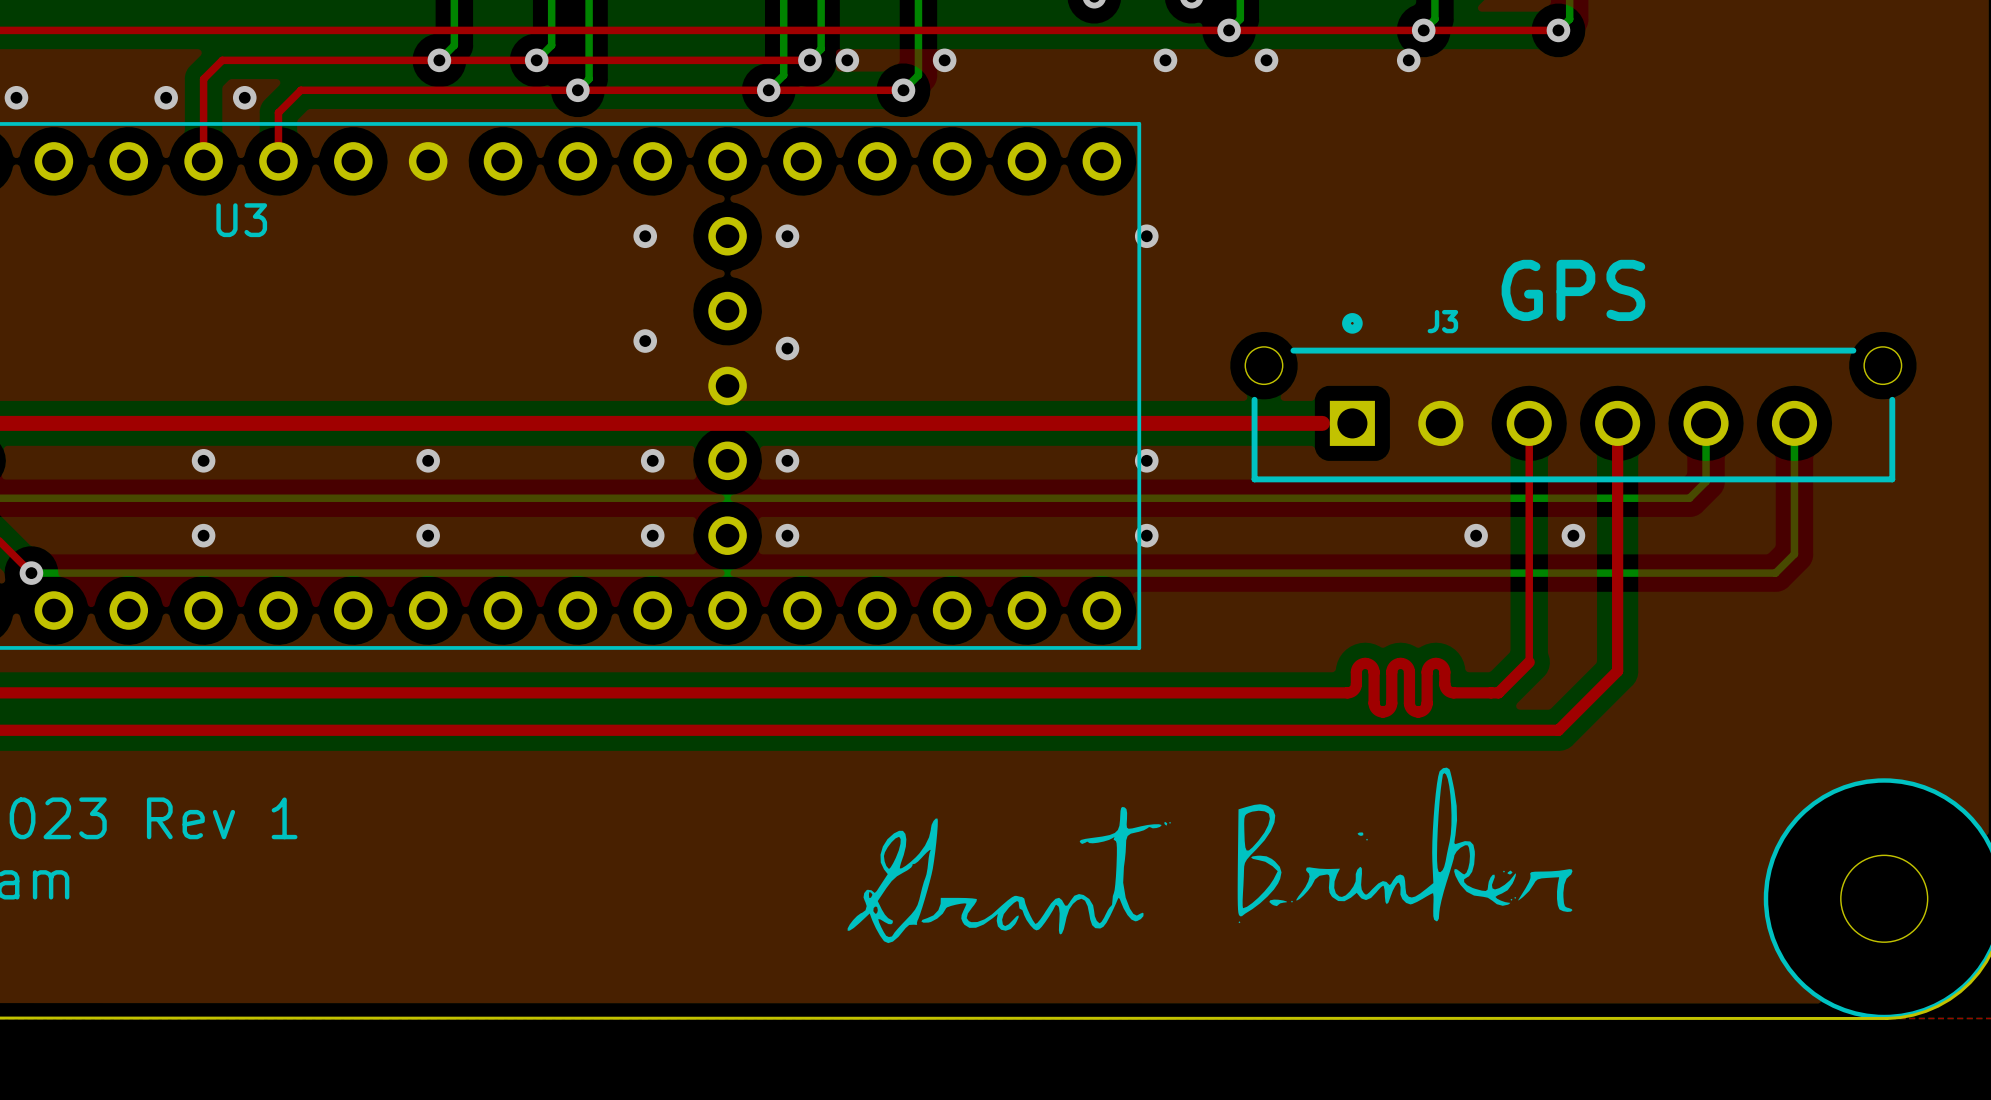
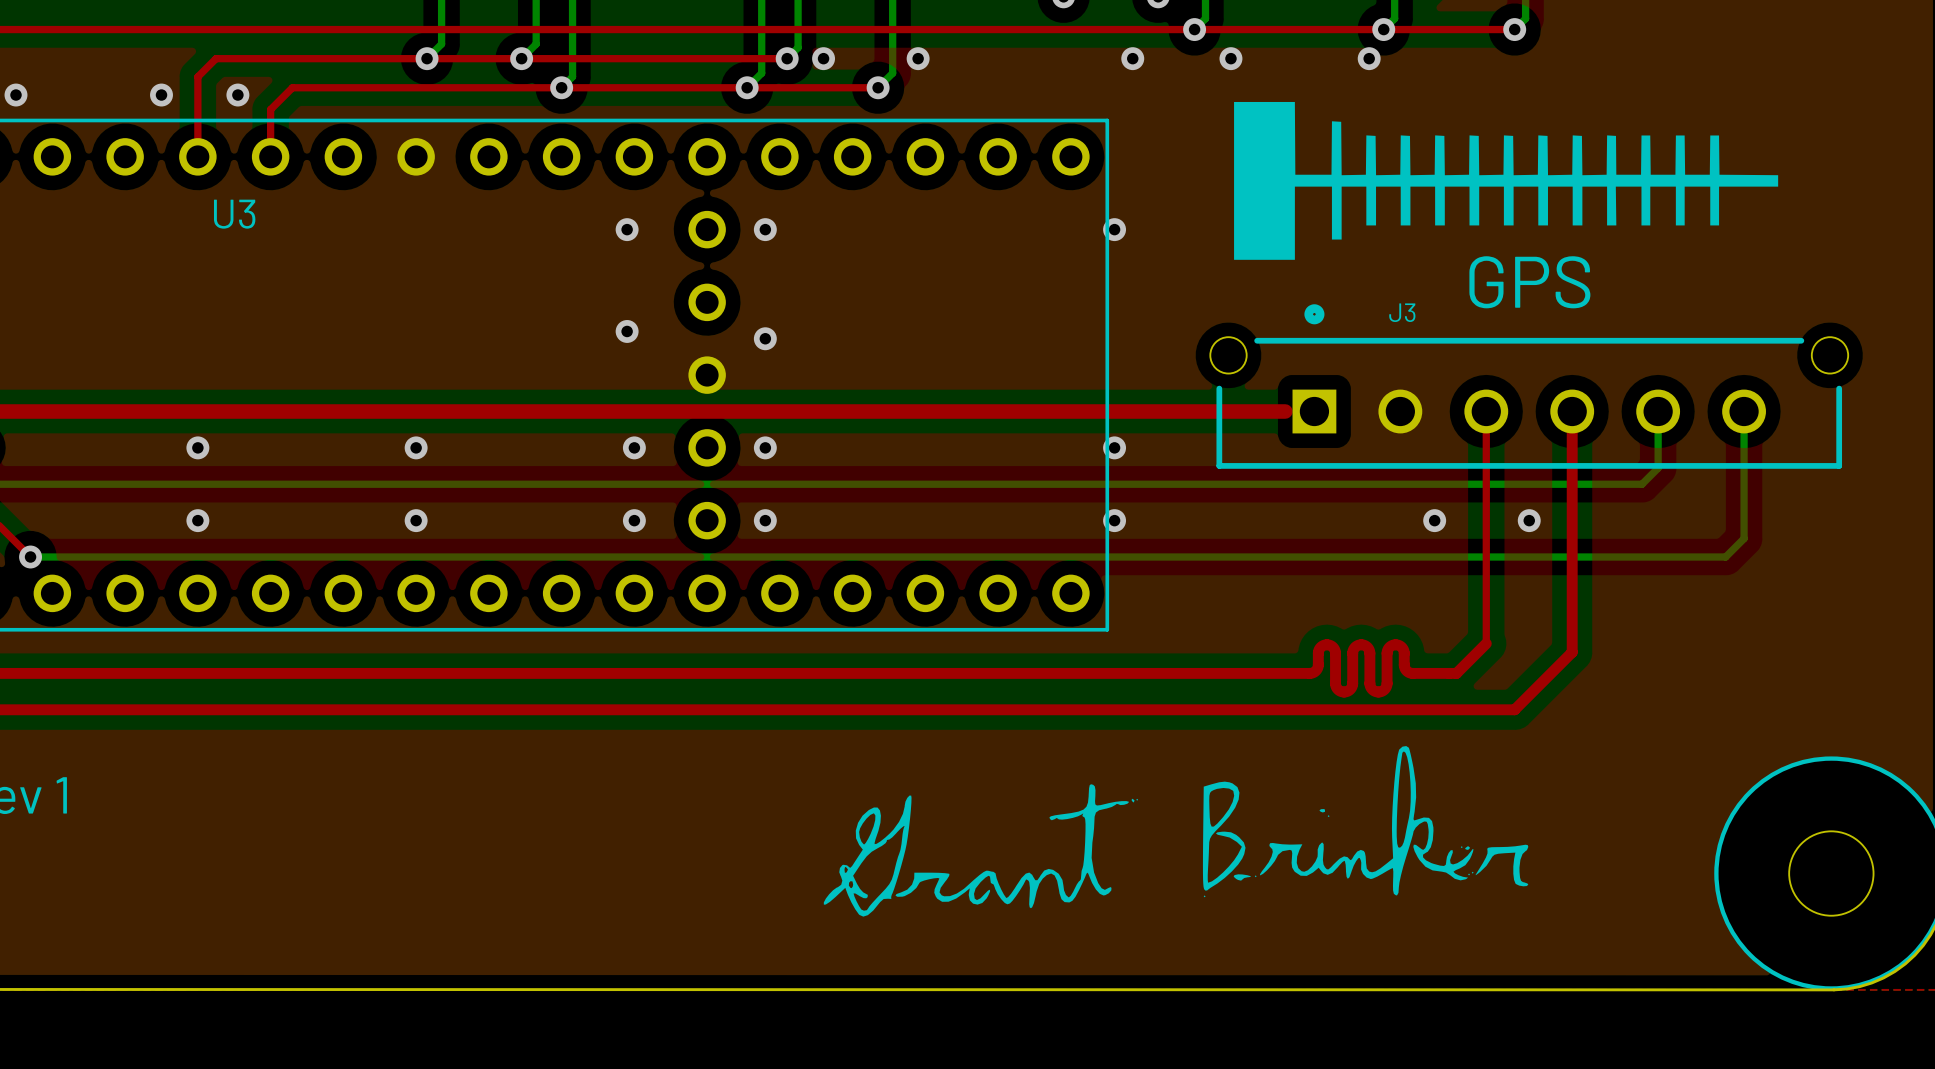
drawing: none -> [1234, 101, 1779, 260]

